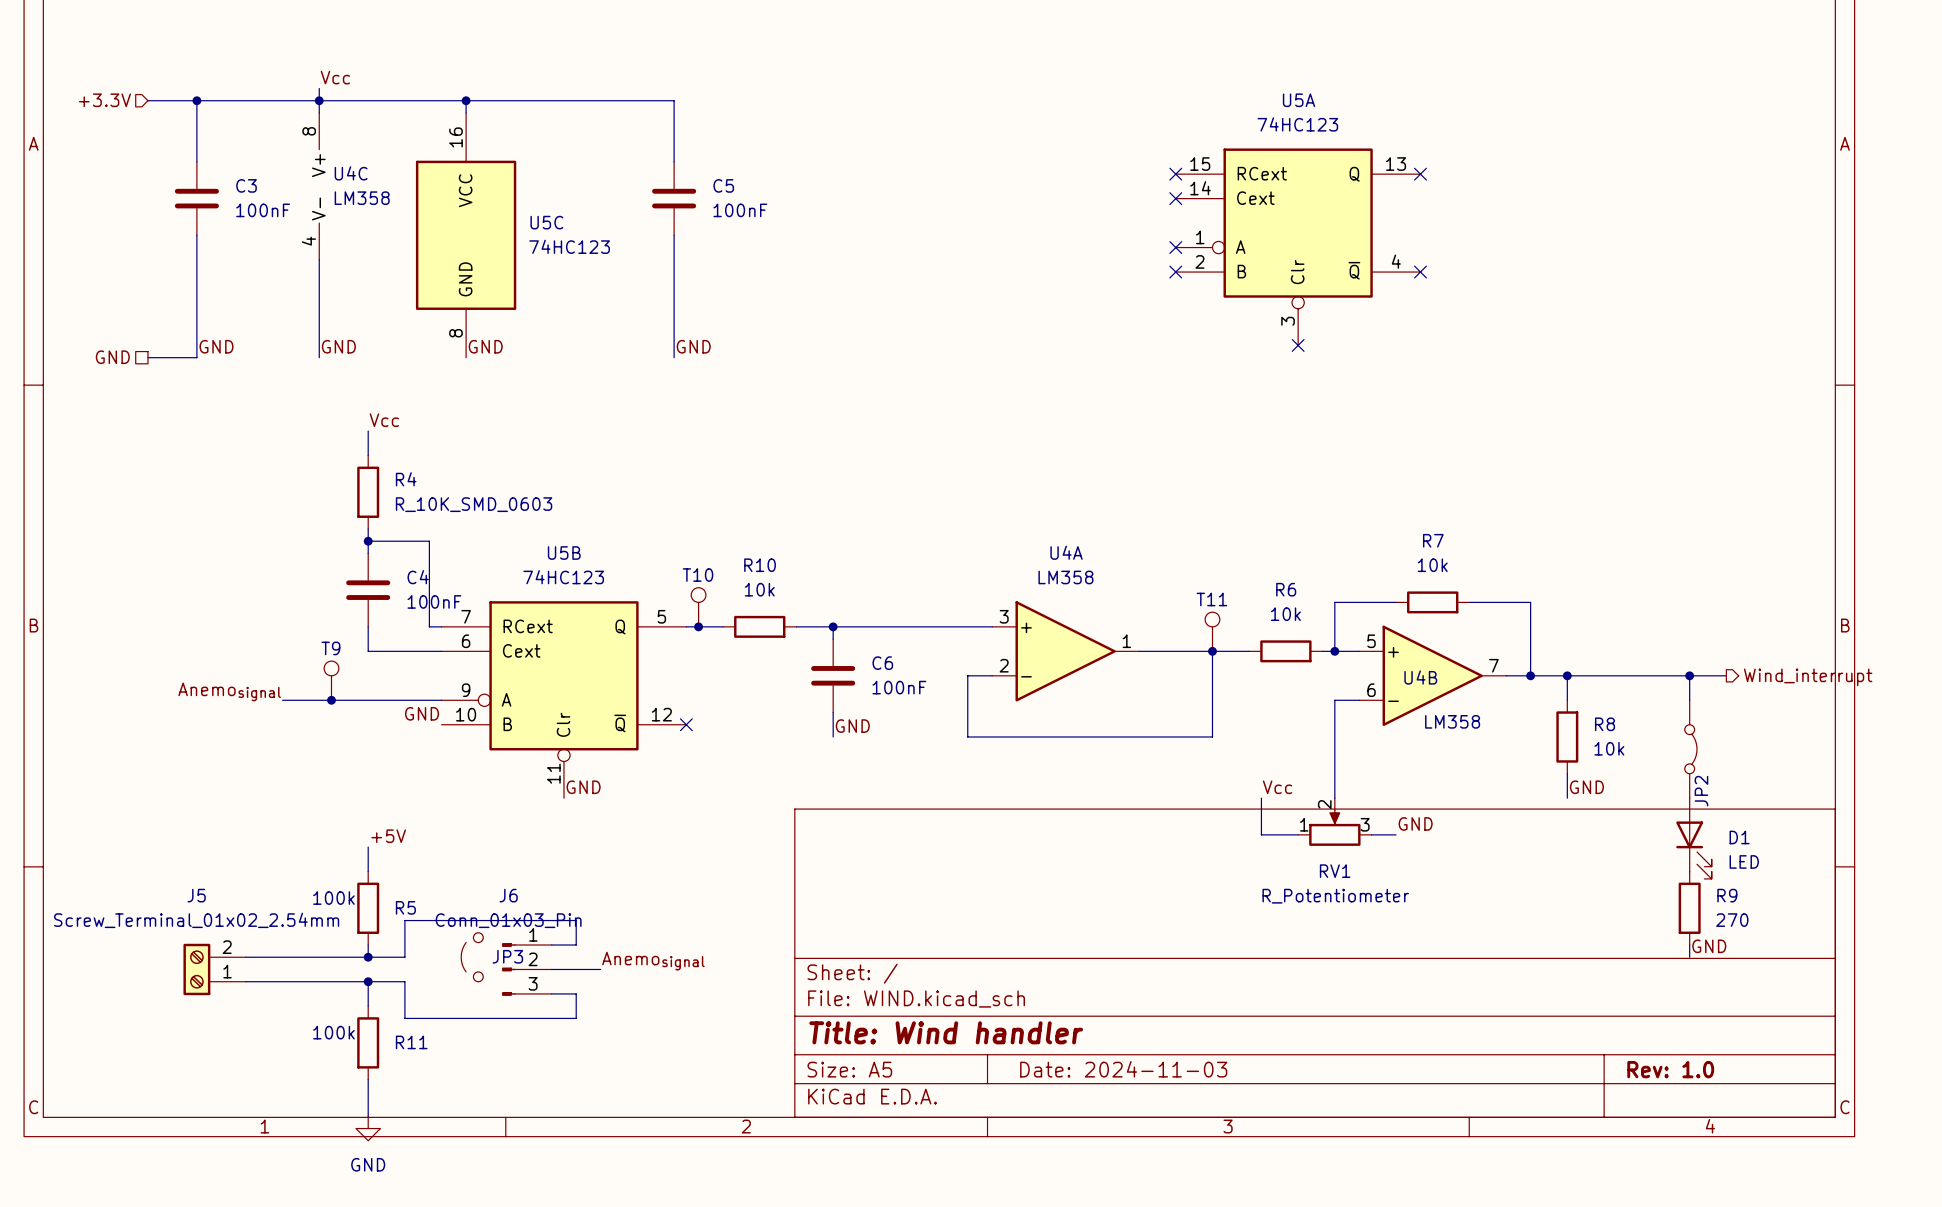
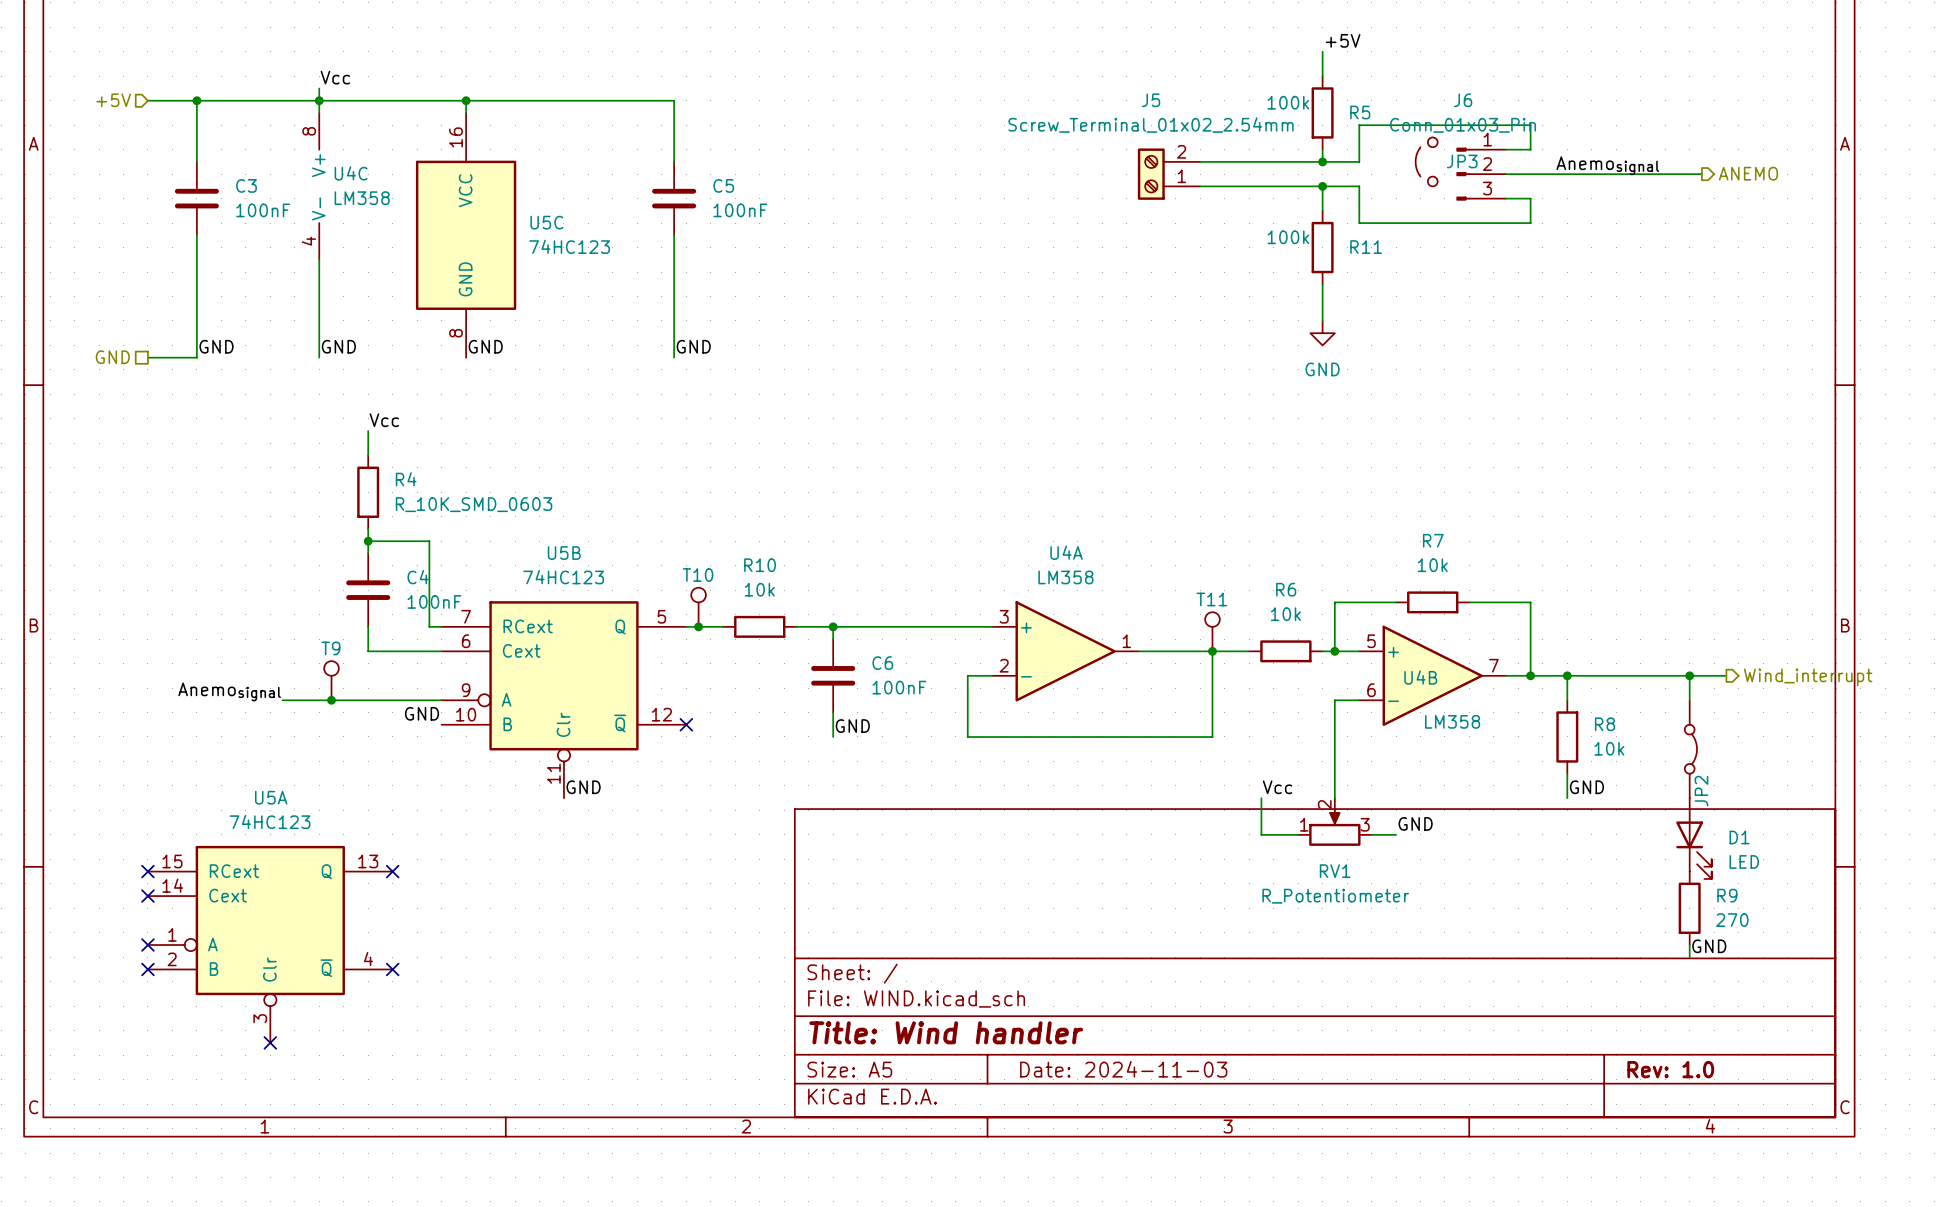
label: none -> +5V (1343, 40)
wire: none -> (1322, 51) (1322, 76)
hierarchical label: +3.3V (104, 100) -> +5V (113, 100)
wire: none -> (1506, 149) (1530, 149) (1530, 125) (1359, 125) (1359, 161) (1200, 161)
junction: none -> (1322, 161)
label: none -> Anemosignal (1607, 165)
hierarchical label: none -> ANEMO (1748, 173)
no-connect mark: (1175, 174) -> none
no-connect mark: (1420, 174) -> none
wire: none -> (1506, 174) (1701, 174)
wire: none -> (1200, 186) (1359, 186) (1359, 223) (1530, 223) (1530, 198) (1506, 198)
junction: none -> (1322, 186)
no-connect mark: (1175, 198) -> none
U5A position: (1298, 246) -> (270, 944)
no-connect mark: (1175, 247) -> none
no-connect mark: (1175, 272) -> none
no-connect mark: (1420, 272) -> none
wire: none -> (1322, 284) (1322, 320)
power symbol: none -> GND (1322, 333)
no-connect mark: (1298, 345) -> none
label: +5V (388, 836) -> none
wire: (368, 847) (368, 871) -> none
no-connect mark: none -> (147, 871)
no-connect mark: none -> (392, 871)
no-connect mark: none -> (147, 896)
R5 position: (368, 908) -> (1322, 112)
no-connect mark: none -> (147, 945)
wire: (368, 945) (368, 957) -> none
wire: (551, 945) (576, 945) (576, 920) (404, 920) (404, 957) (245, 957) -> none
junction: (368, 957) -> none
JP3 position: (472, 957) -> (1426, 161)
label: Anemosignal (653, 961) -> none
no-connect mark: none -> (147, 969)
J5 position: (214, 969) -> (1169, 174)
no-connect mark: none -> (392, 969)
J6 position: (526, 969) -> (1481, 174)
wire: (551, 969) (600, 969) -> none
wire: (245, 981) (404, 981) (404, 1018) (576, 1018) (576, 993) (551, 993) -> none
wire: (368, 981) (368, 1006) -> none
junction: (368, 981) -> none
no-connect mark: none -> (270, 1042)
R11 position: (368, 1042) -> (1322, 247)
wire: (368, 1079) (368, 1116) -> none
power symbol: GND (368, 1128) -> none

